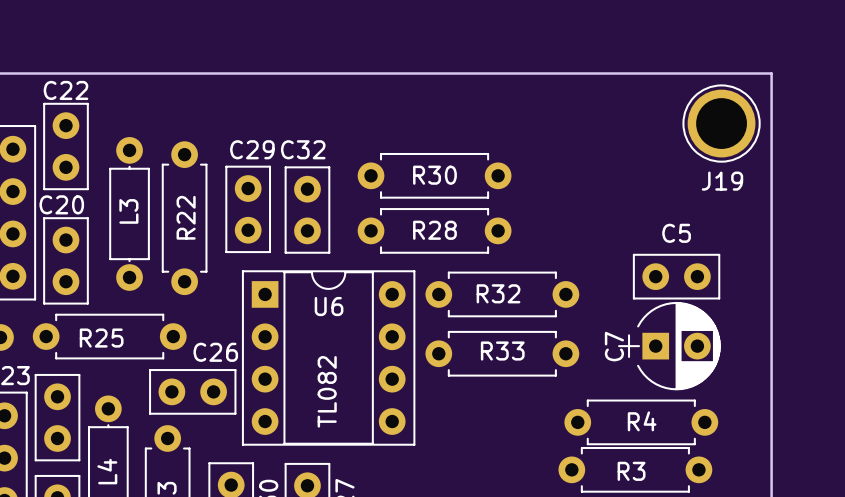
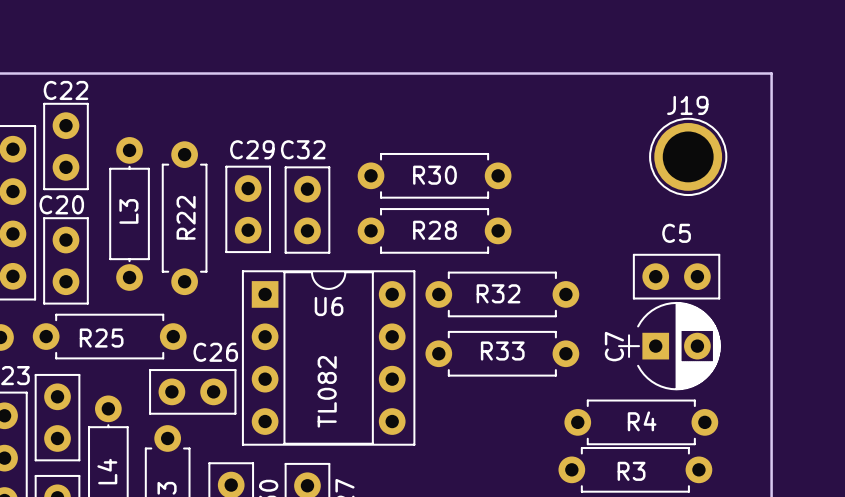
J19 position: (721, 123) -> (688, 156)
J19 name position: J19 (722, 181) -> J19 (687, 105)

